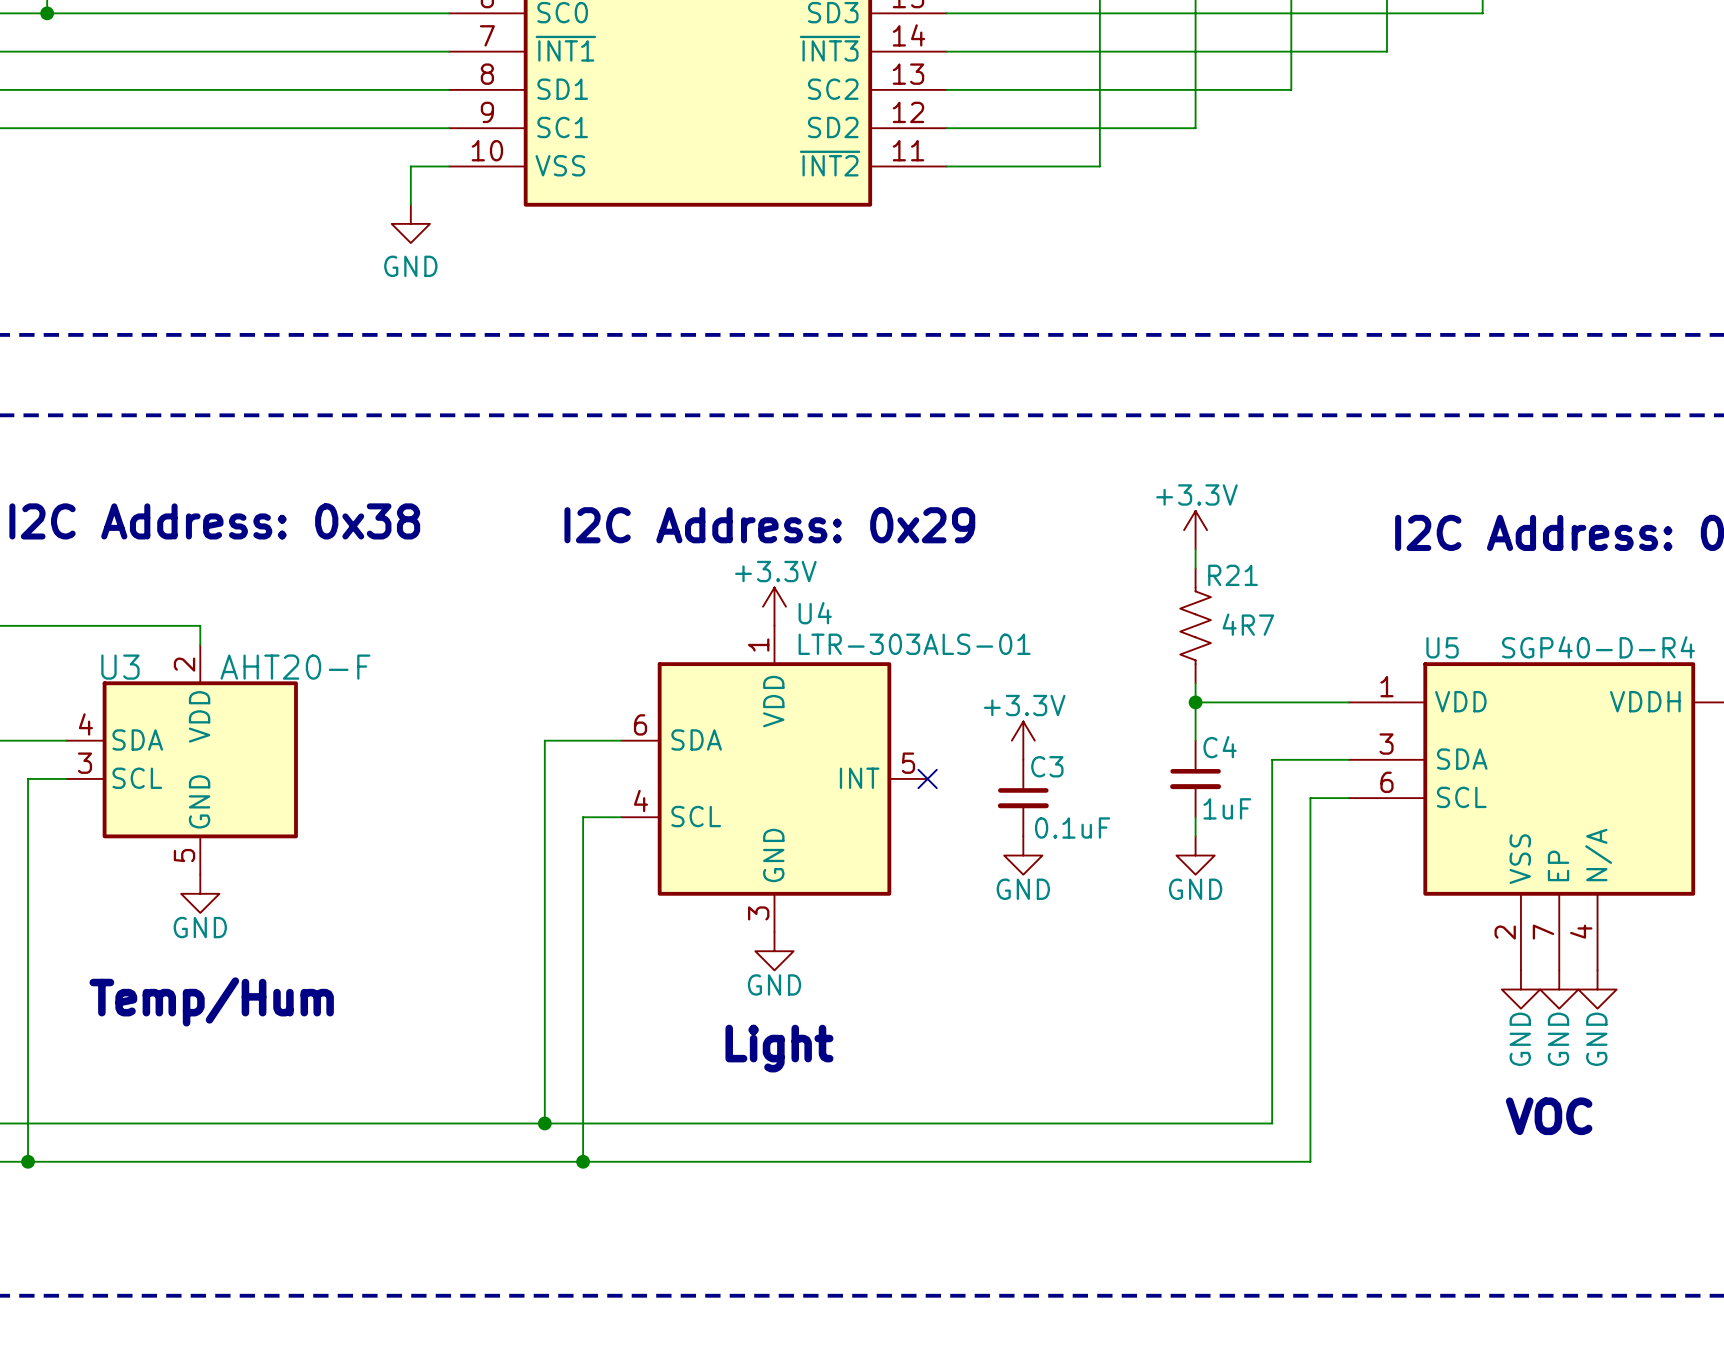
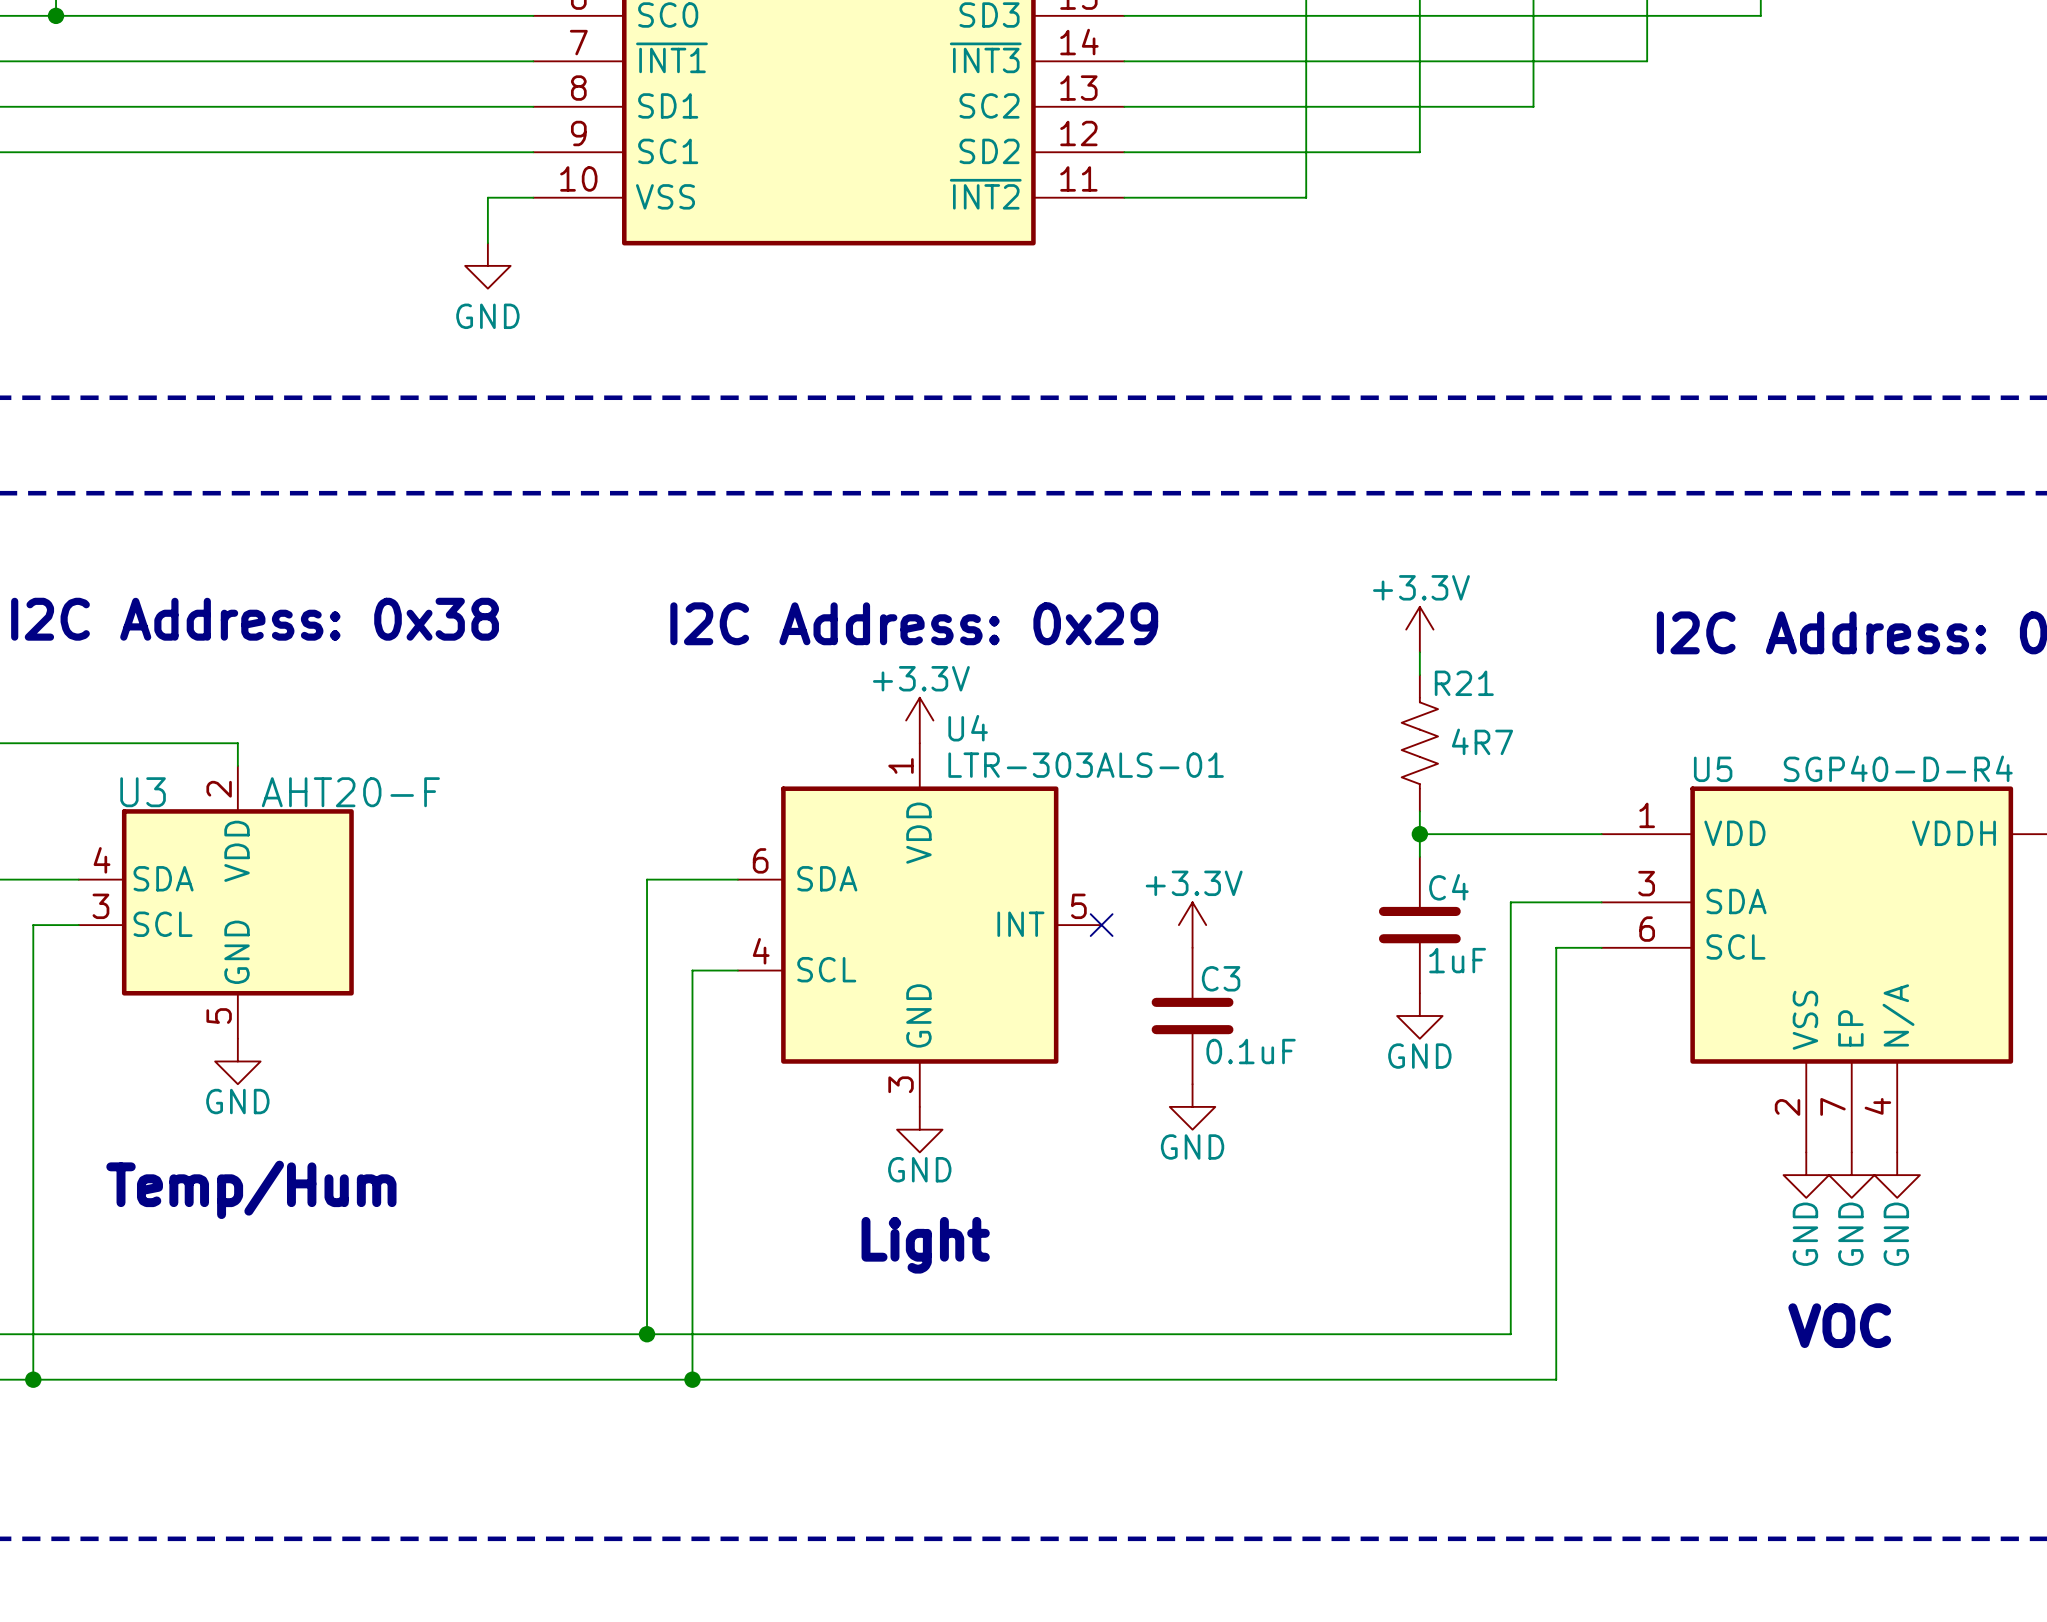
power symbol position: +3.3V (1023, 740) -> +3.3V (1192, 925)
C4 symbol: [1170, 740, 1222, 818] -> [1378, 856, 1461, 994]
C3 symbol: [997, 759, 1049, 837] -> [1151, 947, 1234, 1085]
power symbol position: GND (1023, 855) -> GND (1192, 1106)

